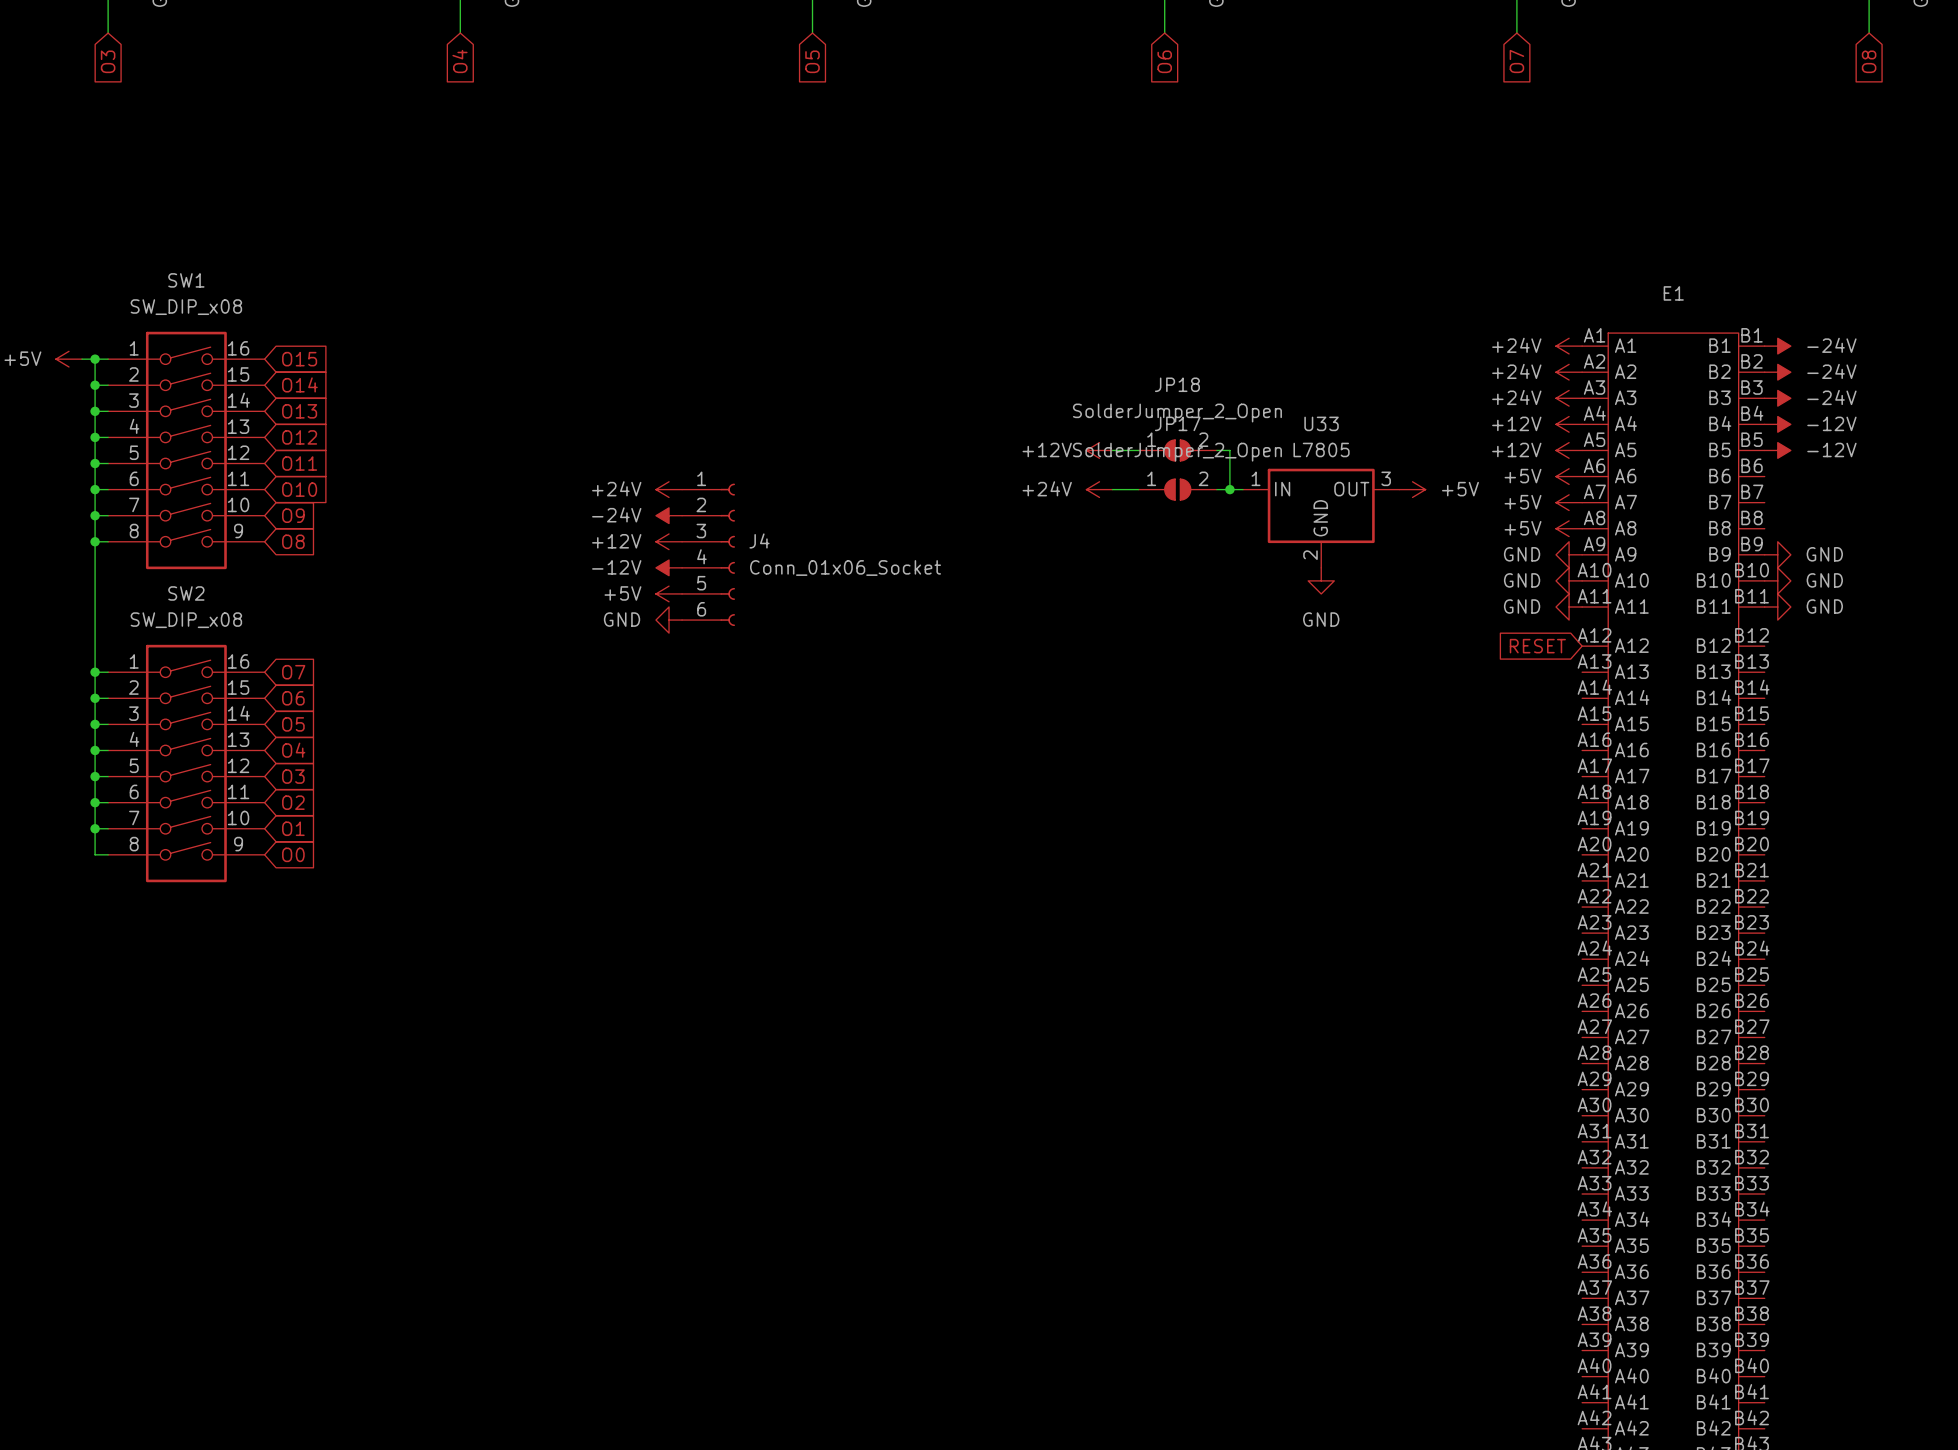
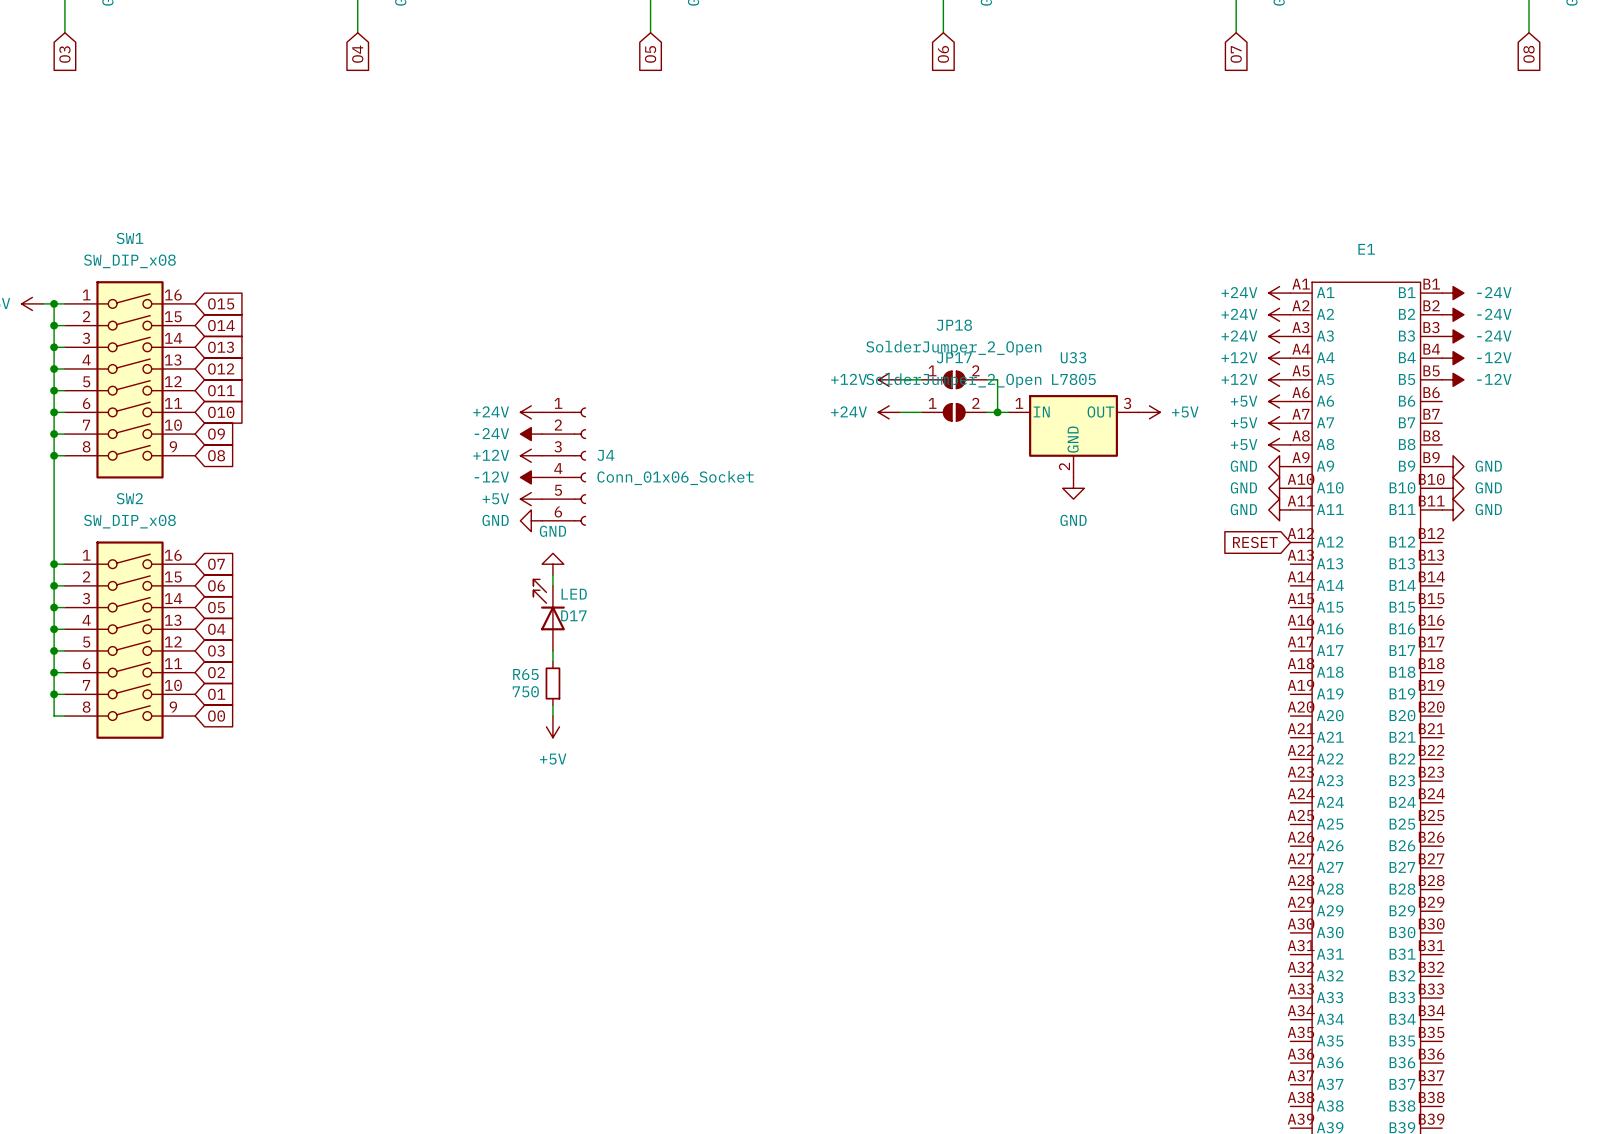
power symbol: none -> GND (552, 564)
wire: none -> (552, 575) (552, 585)
D17: none -> LED (549, 615)
wire: none -> (552, 650) (552, 661)
R65: none -> 750 (552, 683)
wire: none -> (552, 705) (552, 716)
power symbol: none -> +5V (552, 726)

